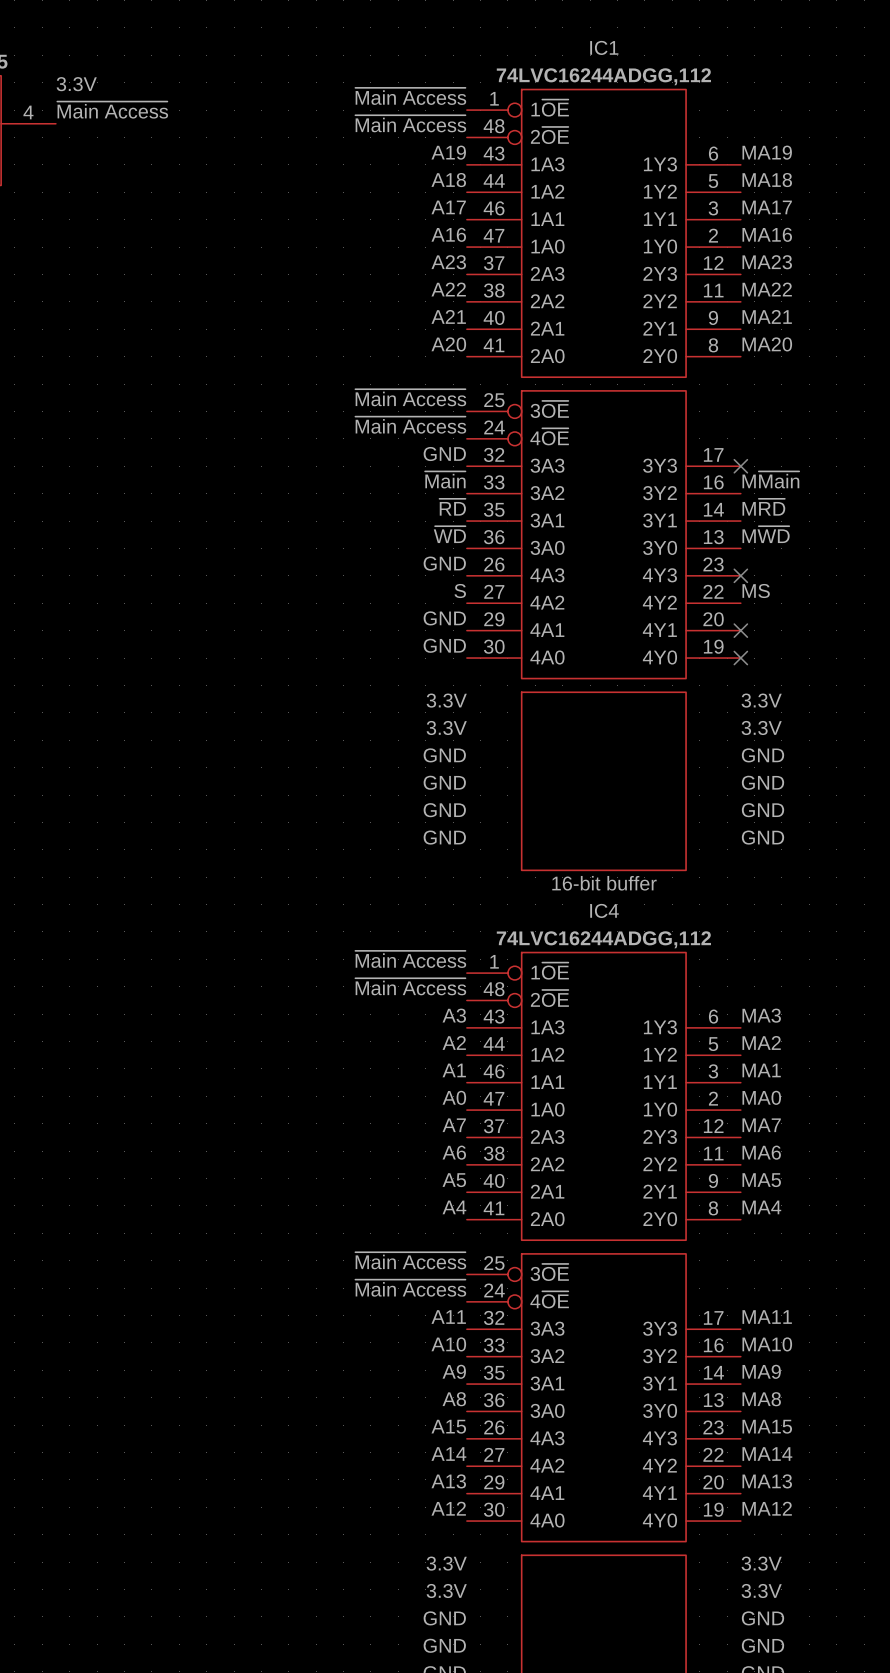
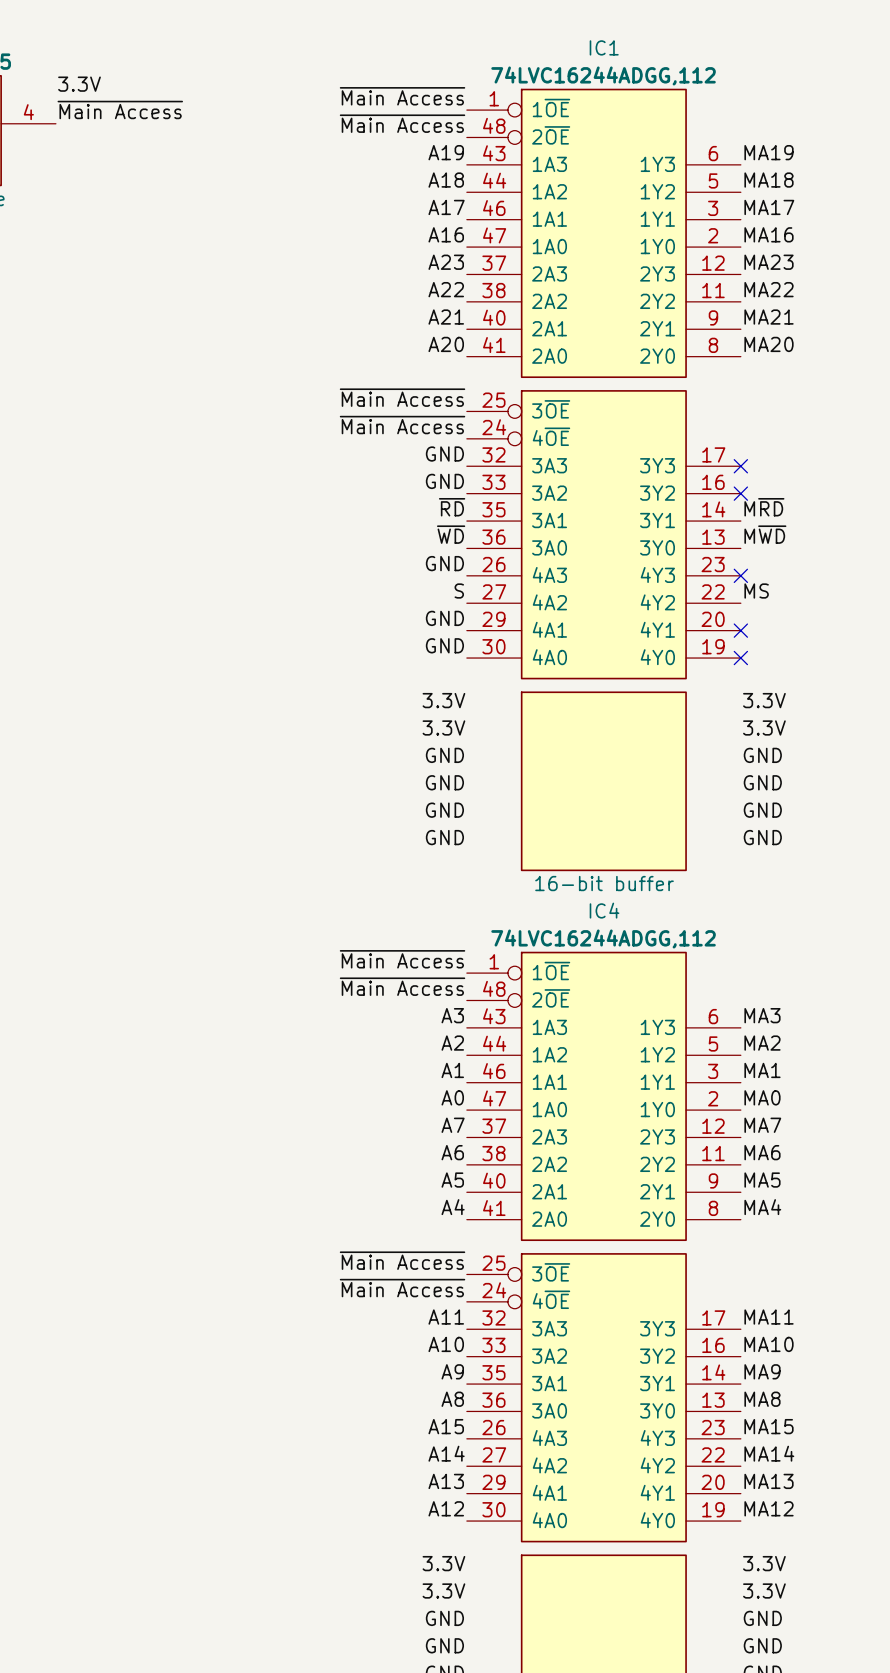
label: ~{Main} (445, 479) -> GND (444, 481)
label: M~{Main} (770, 479) -> none
no-connect mark: none -> (740, 493)

